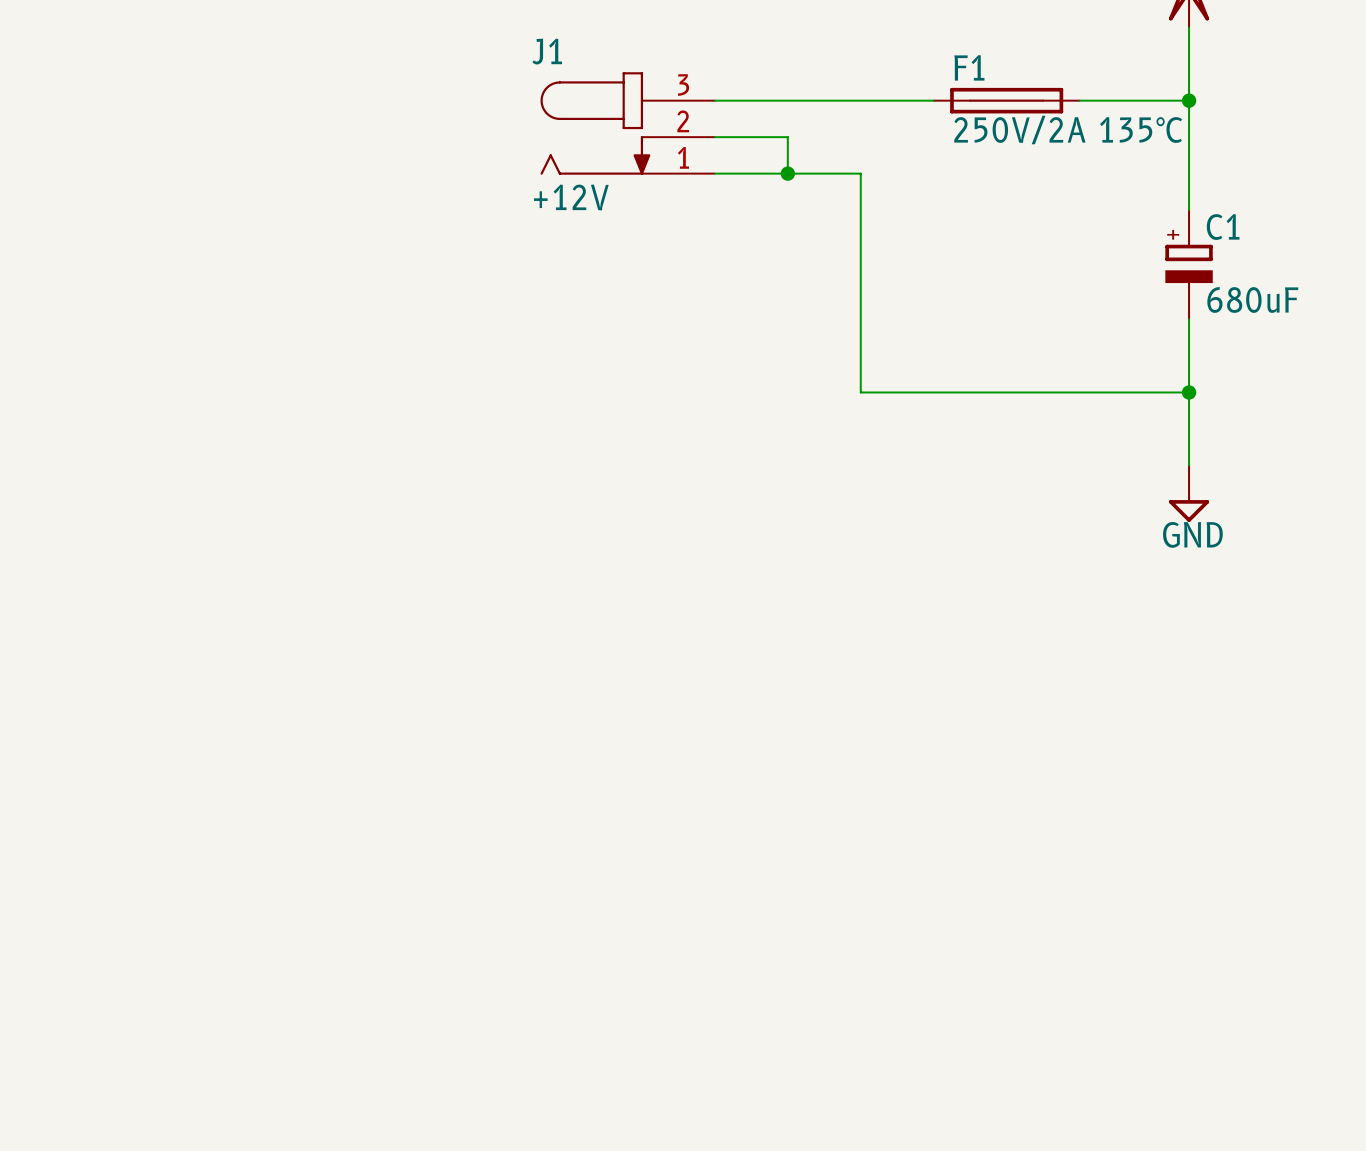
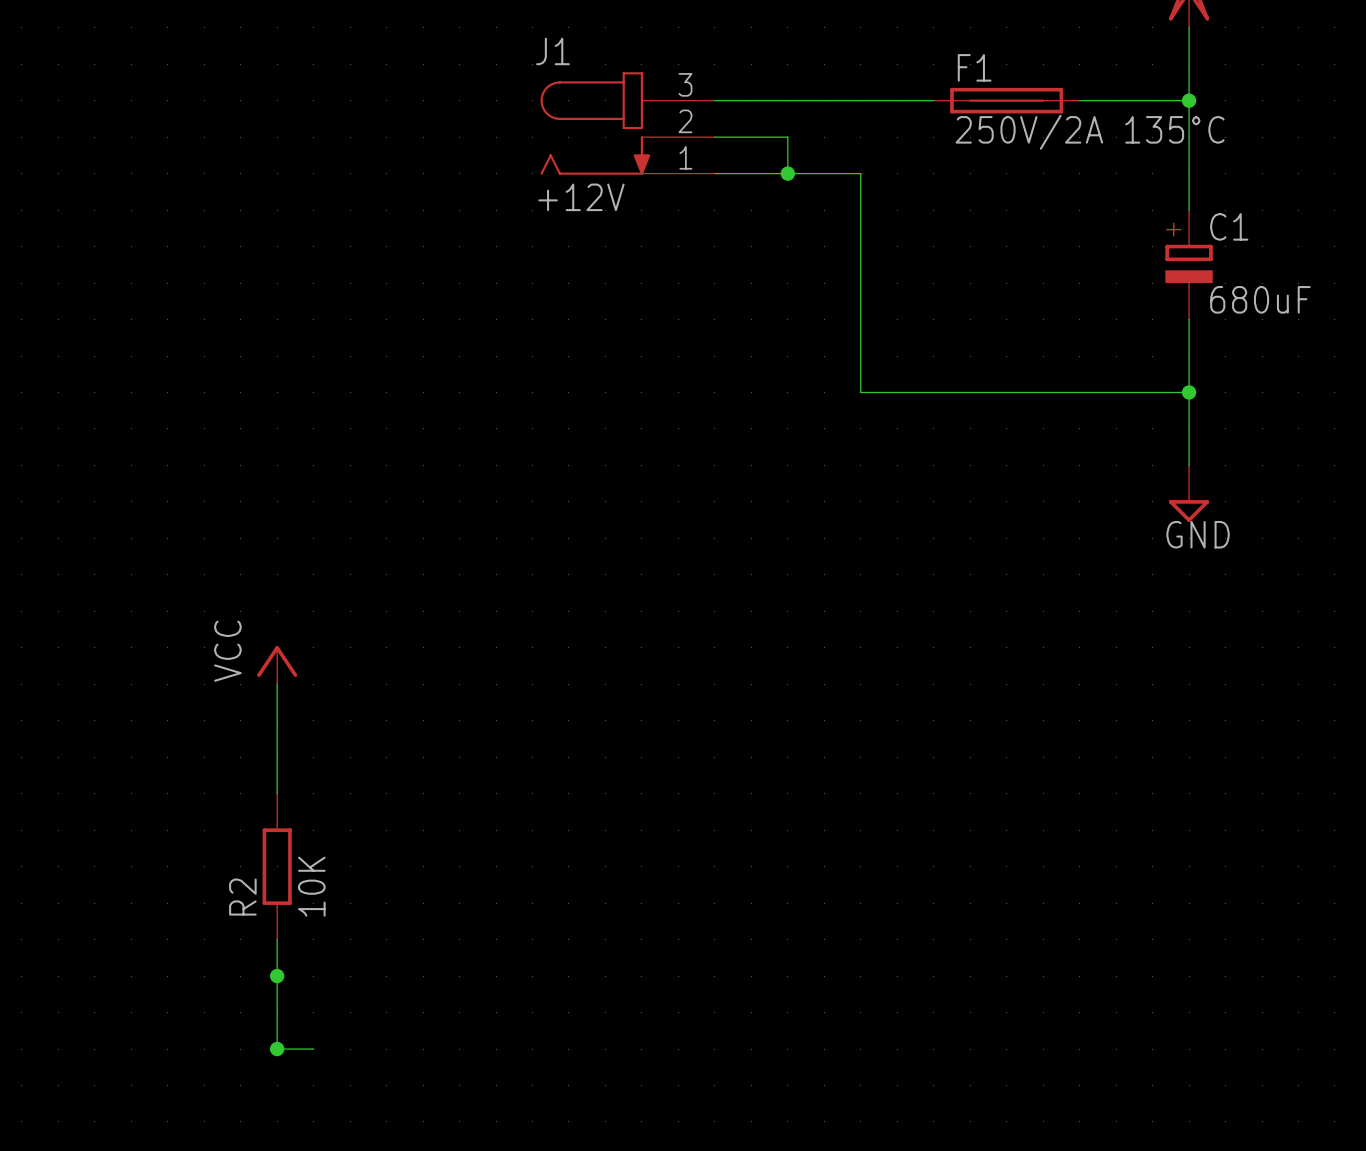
power symbol: none -> VCC (277, 665)
wire: none -> (277, 684) (277, 793)
R2: none -> 10K (277, 866)
wire: none -> (277, 939) (277, 1049) (313, 1049)
junction: none -> (277, 976)
junction: none -> (277, 1049)

